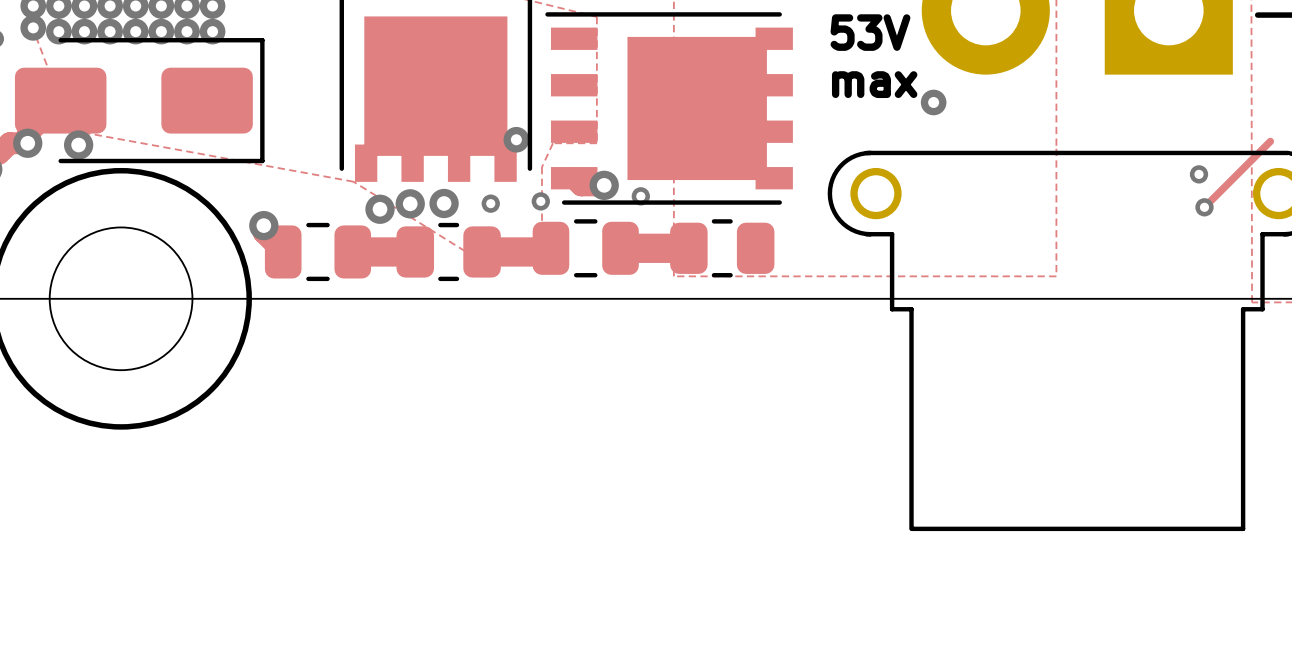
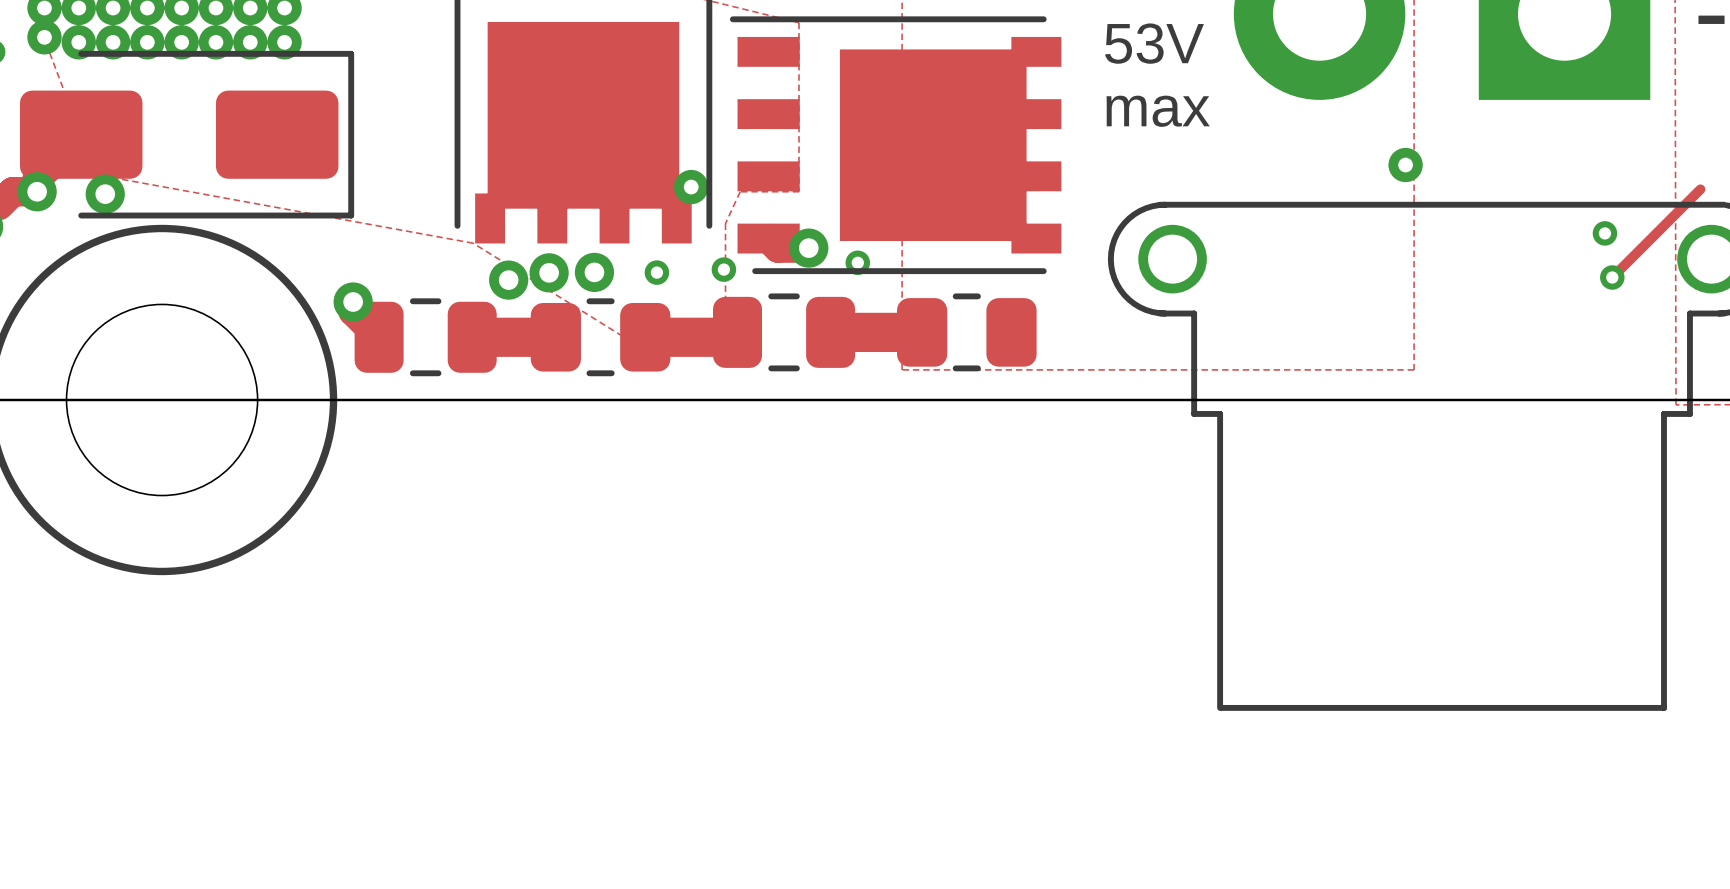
via position: (933, 102) -> (1405, 165)

